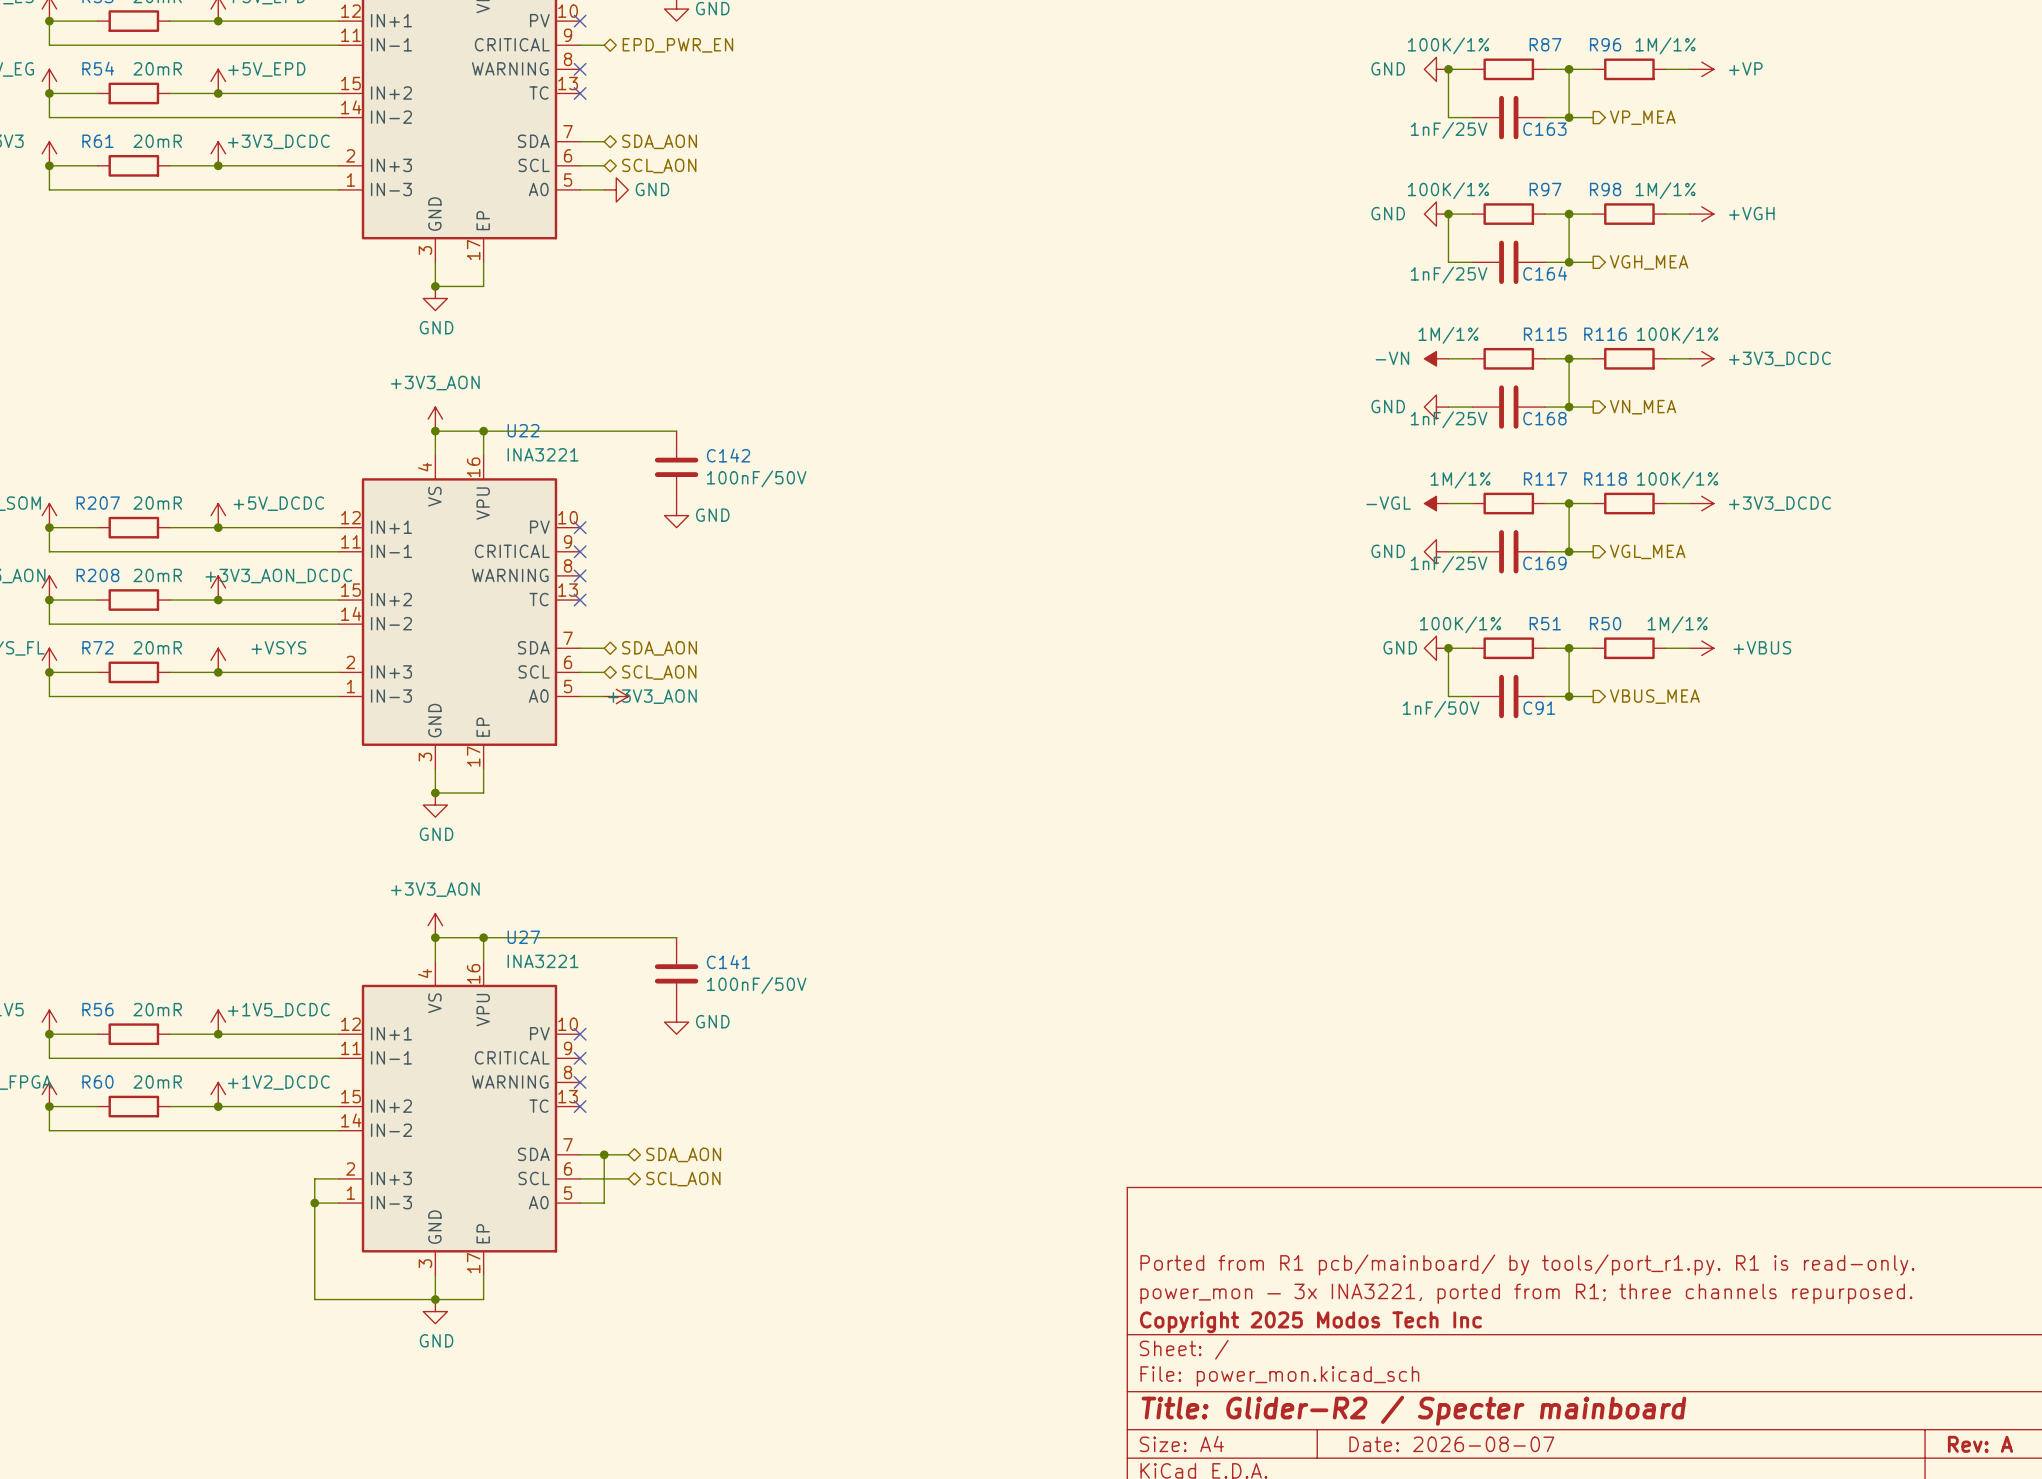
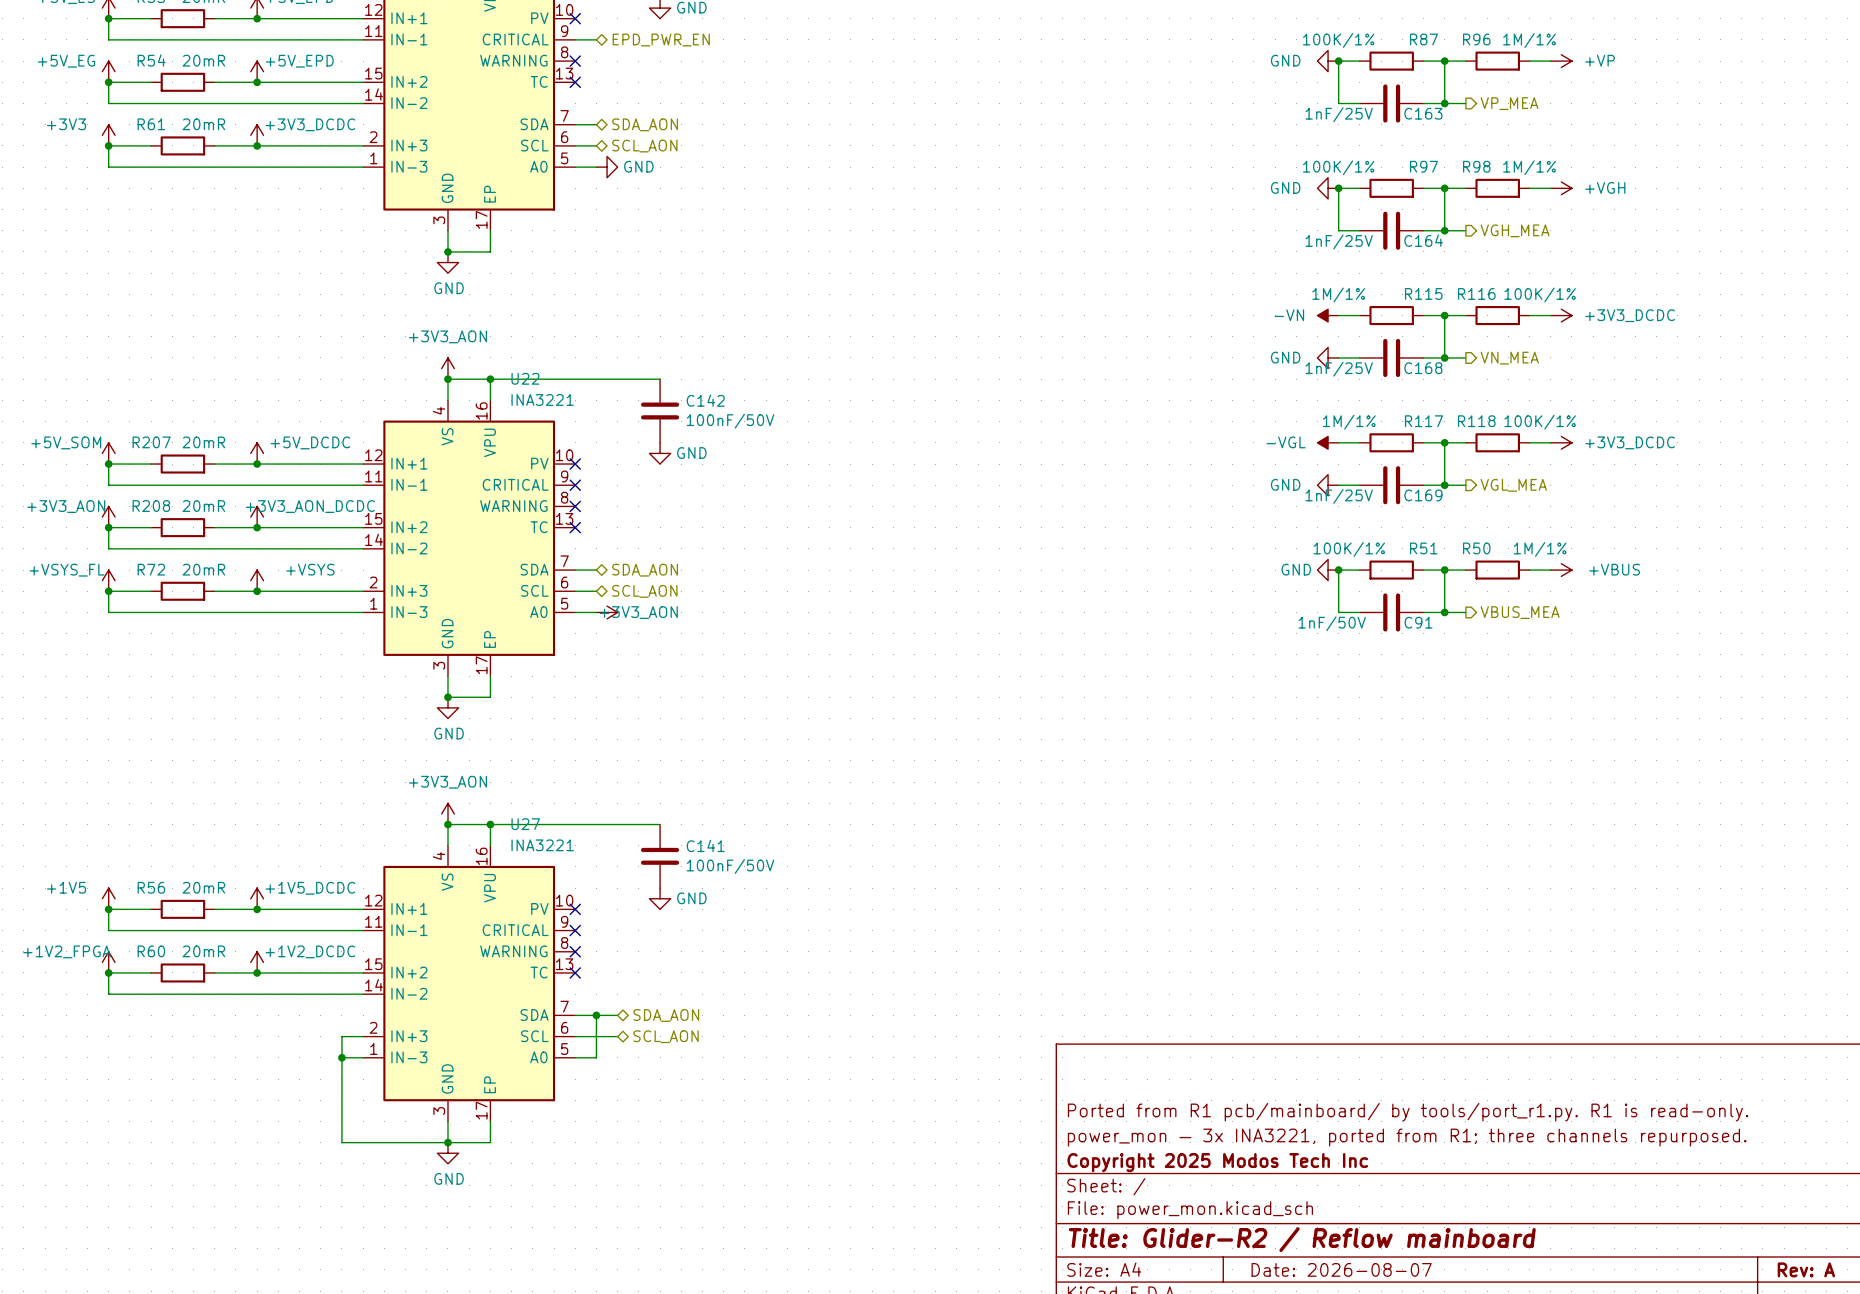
title block: Title: Glider-R2 / Specter mainboard (1413, 1410) -> Title: Glider-R2 / Reflow mainboard (1302, 1239)

